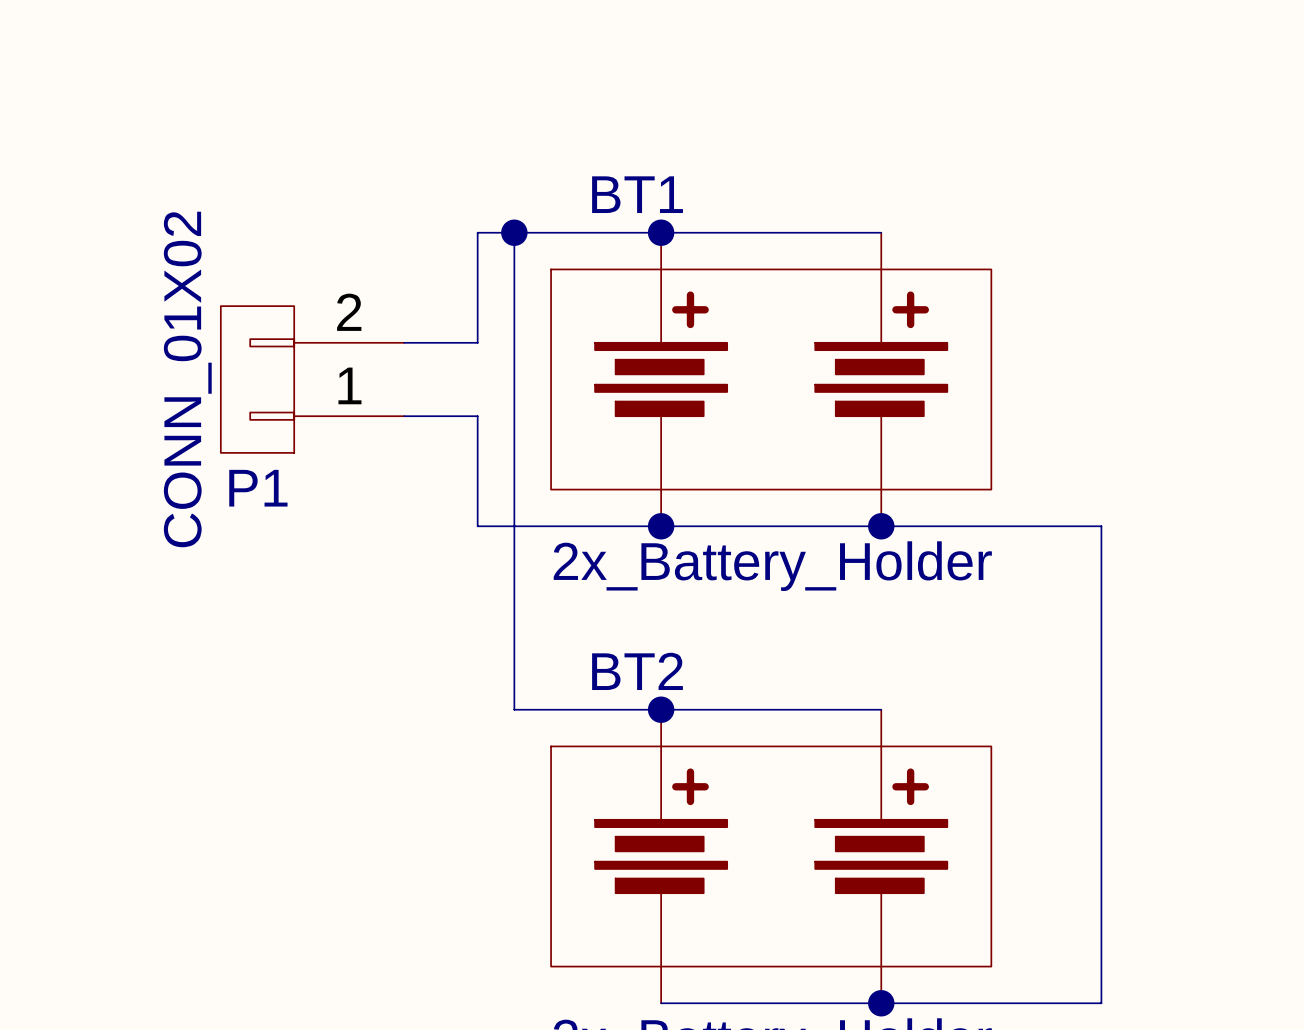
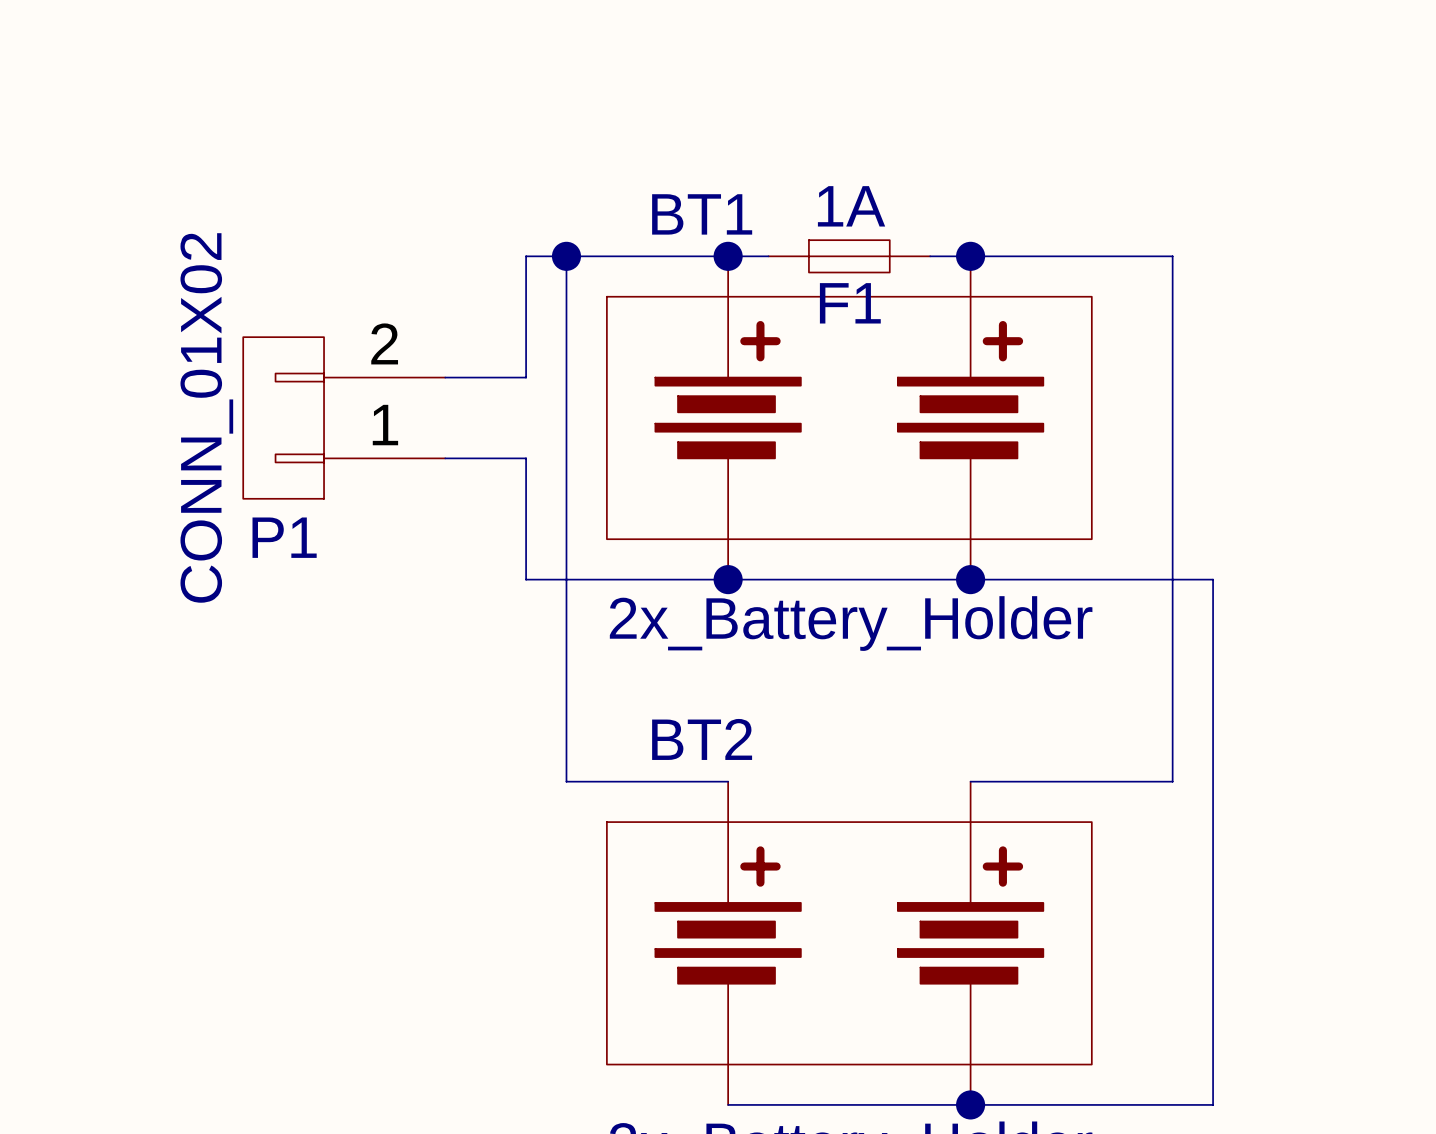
F1: none -> 1A (849, 256)
junction: none -> (970, 256)
wire: (661, 709) (881, 709) -> (970, 256) (1172, 256) (1172, 781) (970, 781)
junction: (661, 709) -> none

